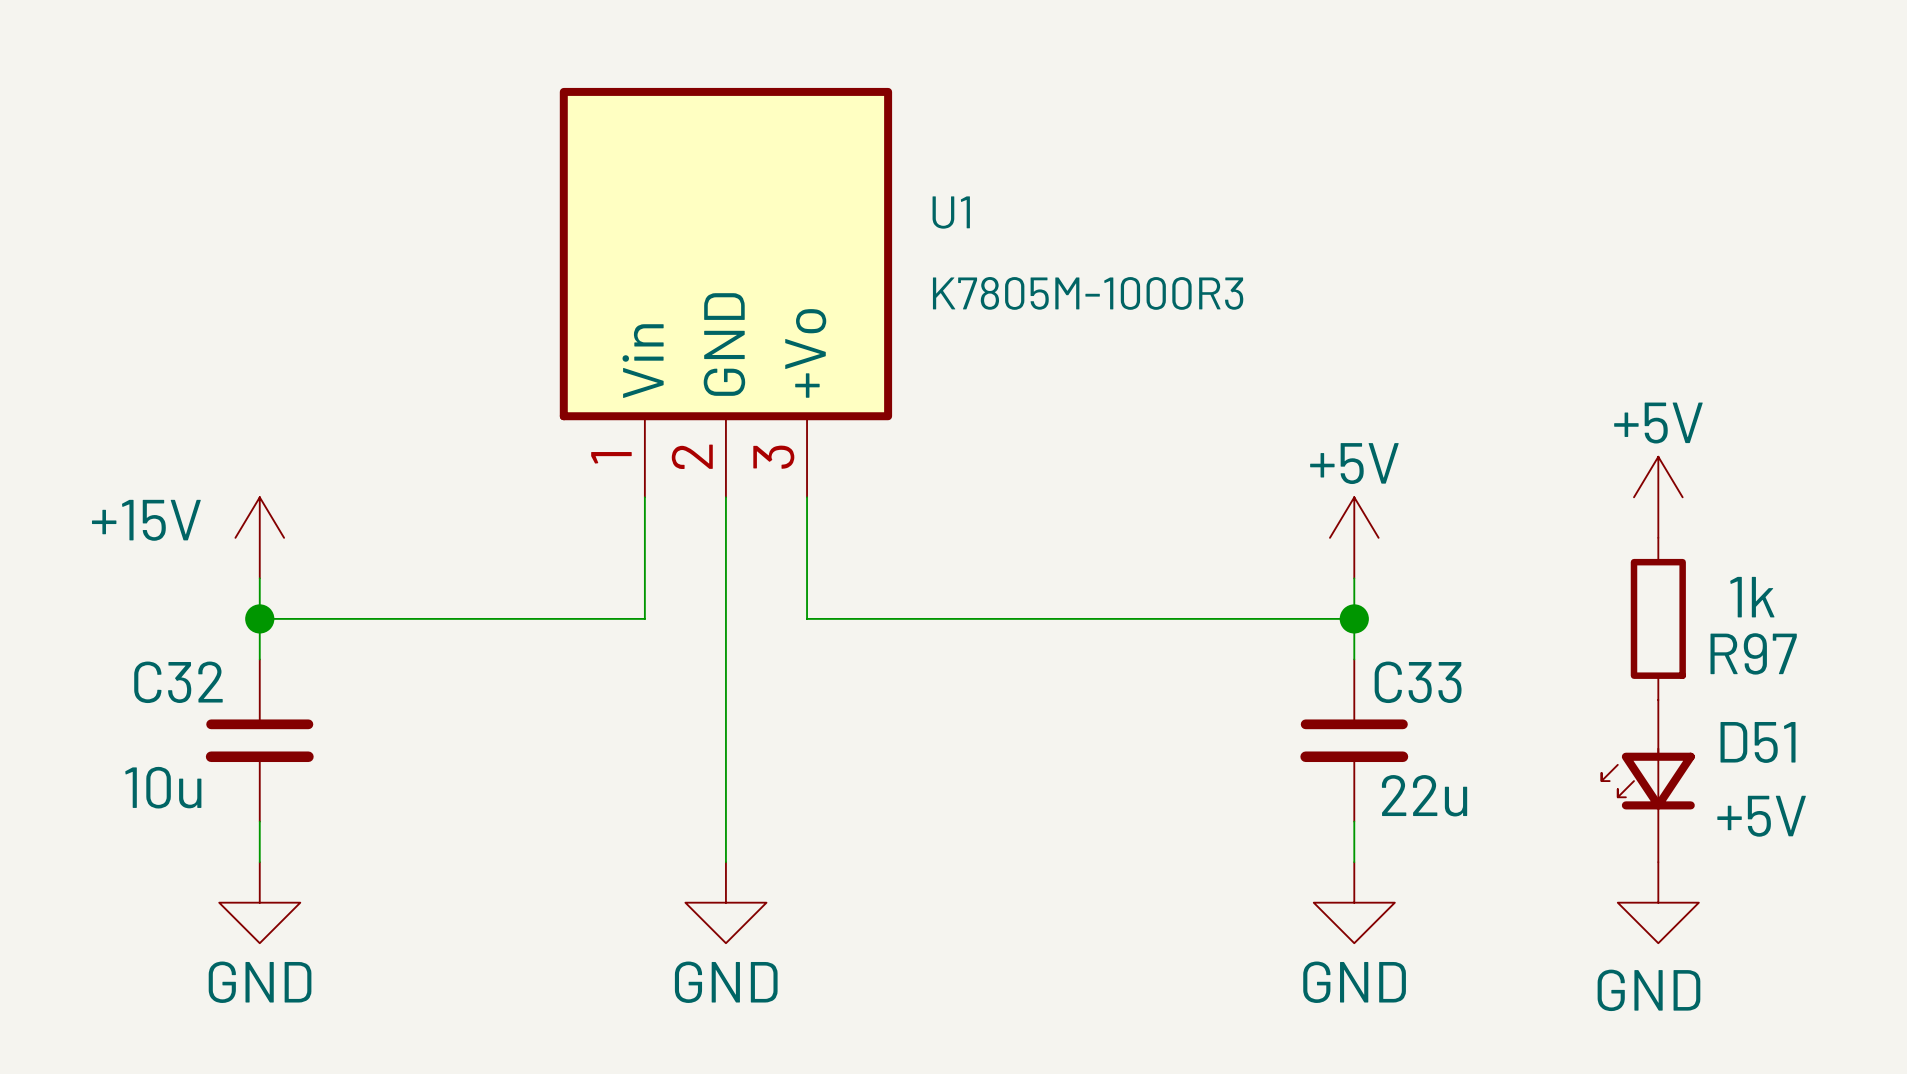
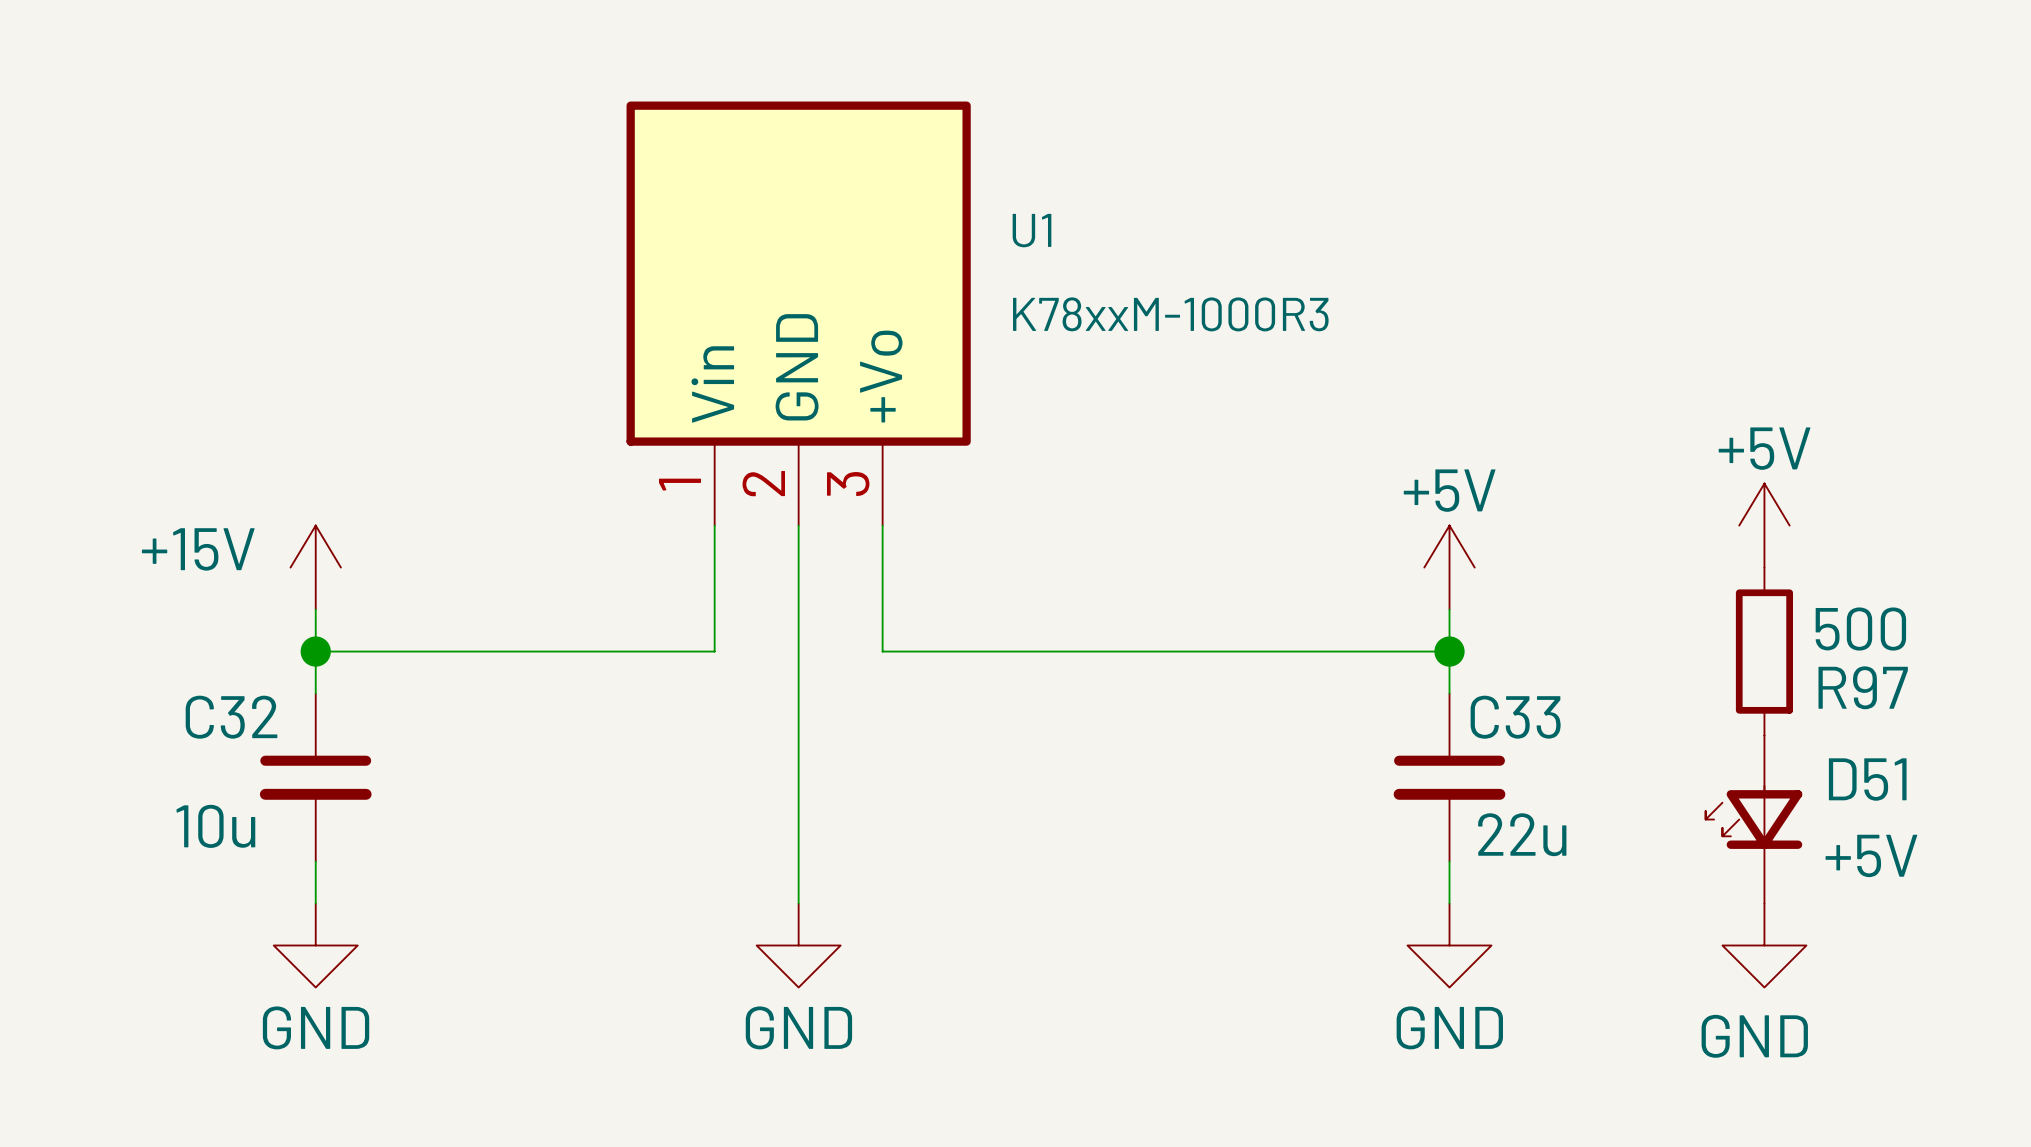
U1 value: K7805M-1000R3 (1088, 293) -> K78xxM-1000R3 (1170, 314)
R97 value: 1k (1752, 597) -> 500 (1860, 629)

